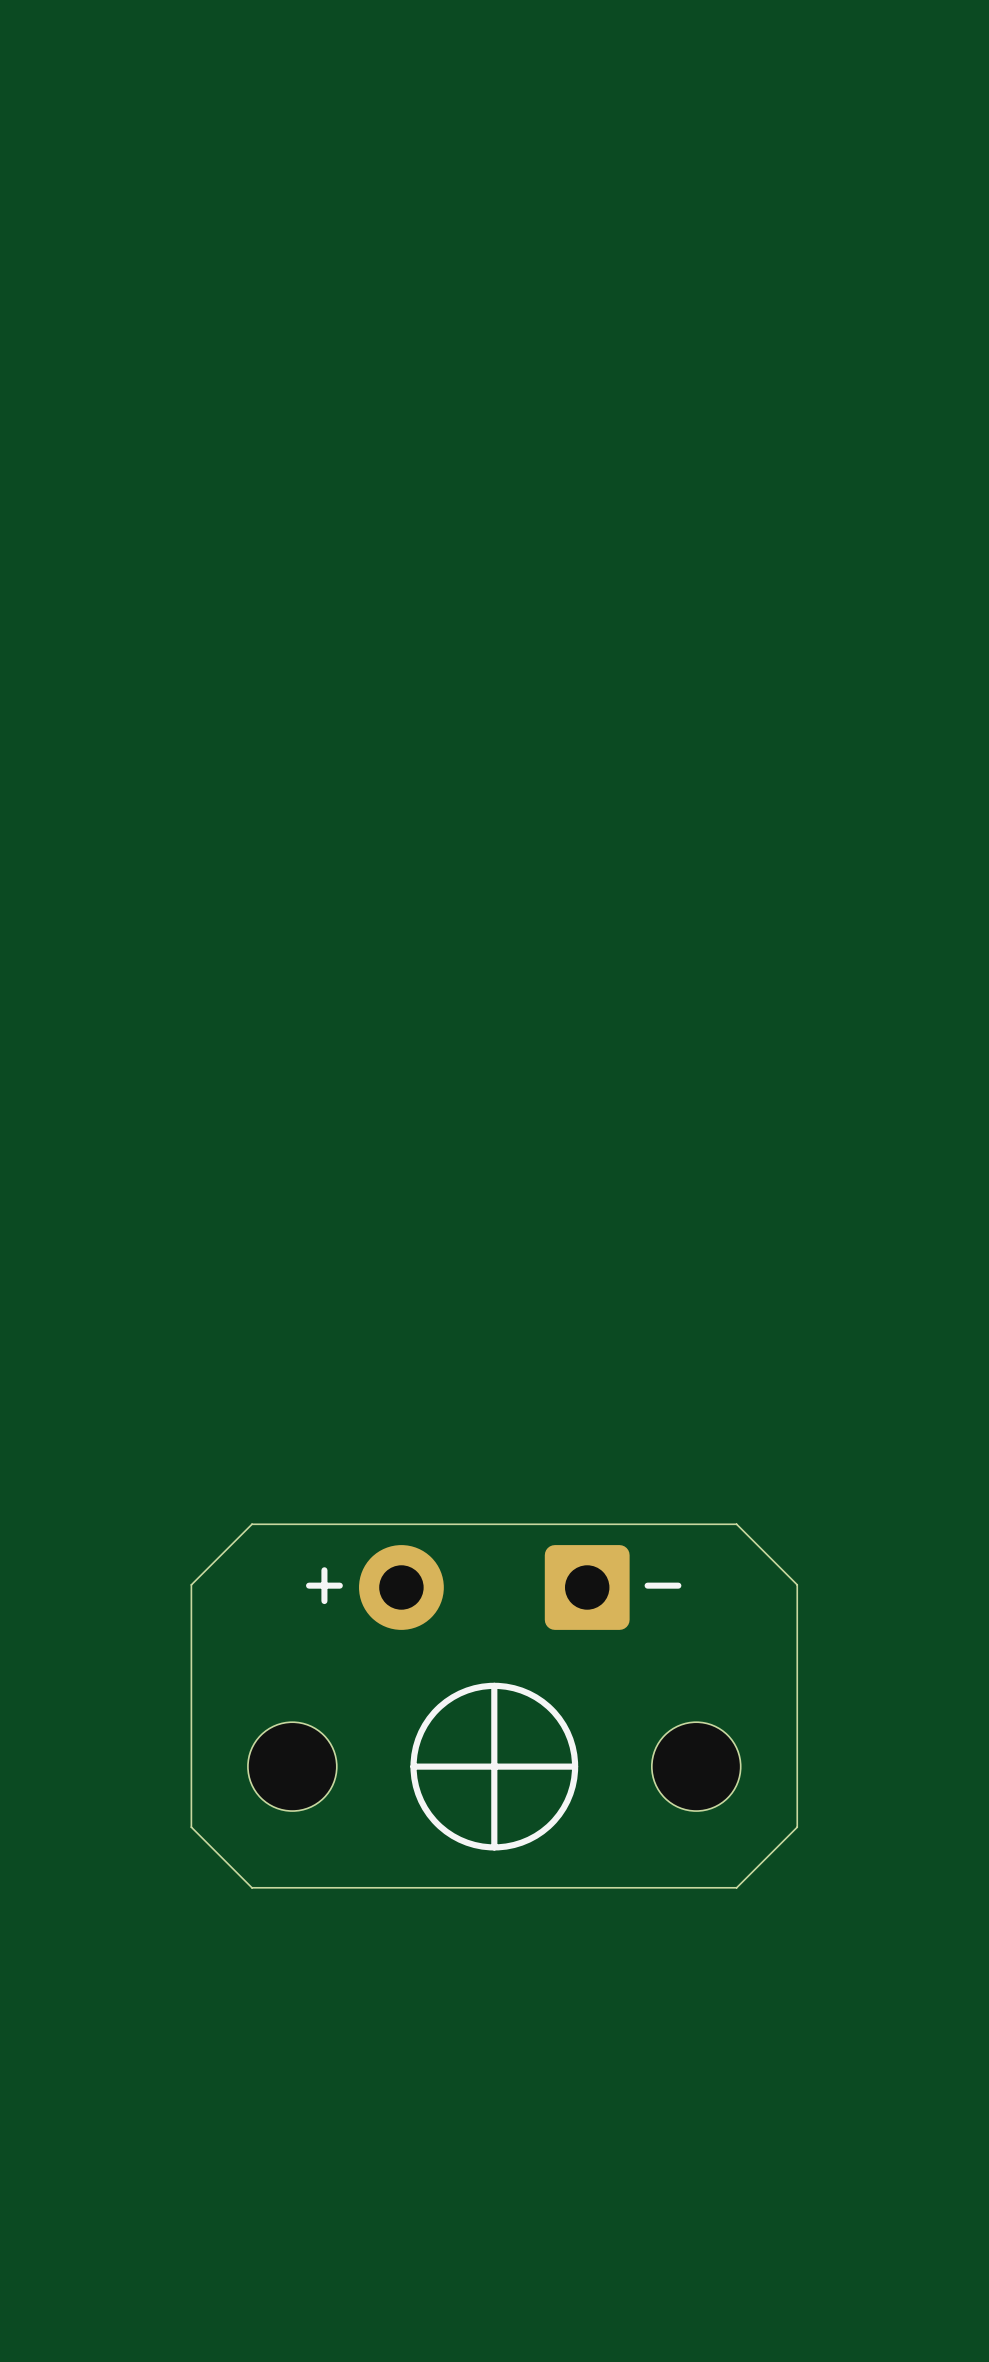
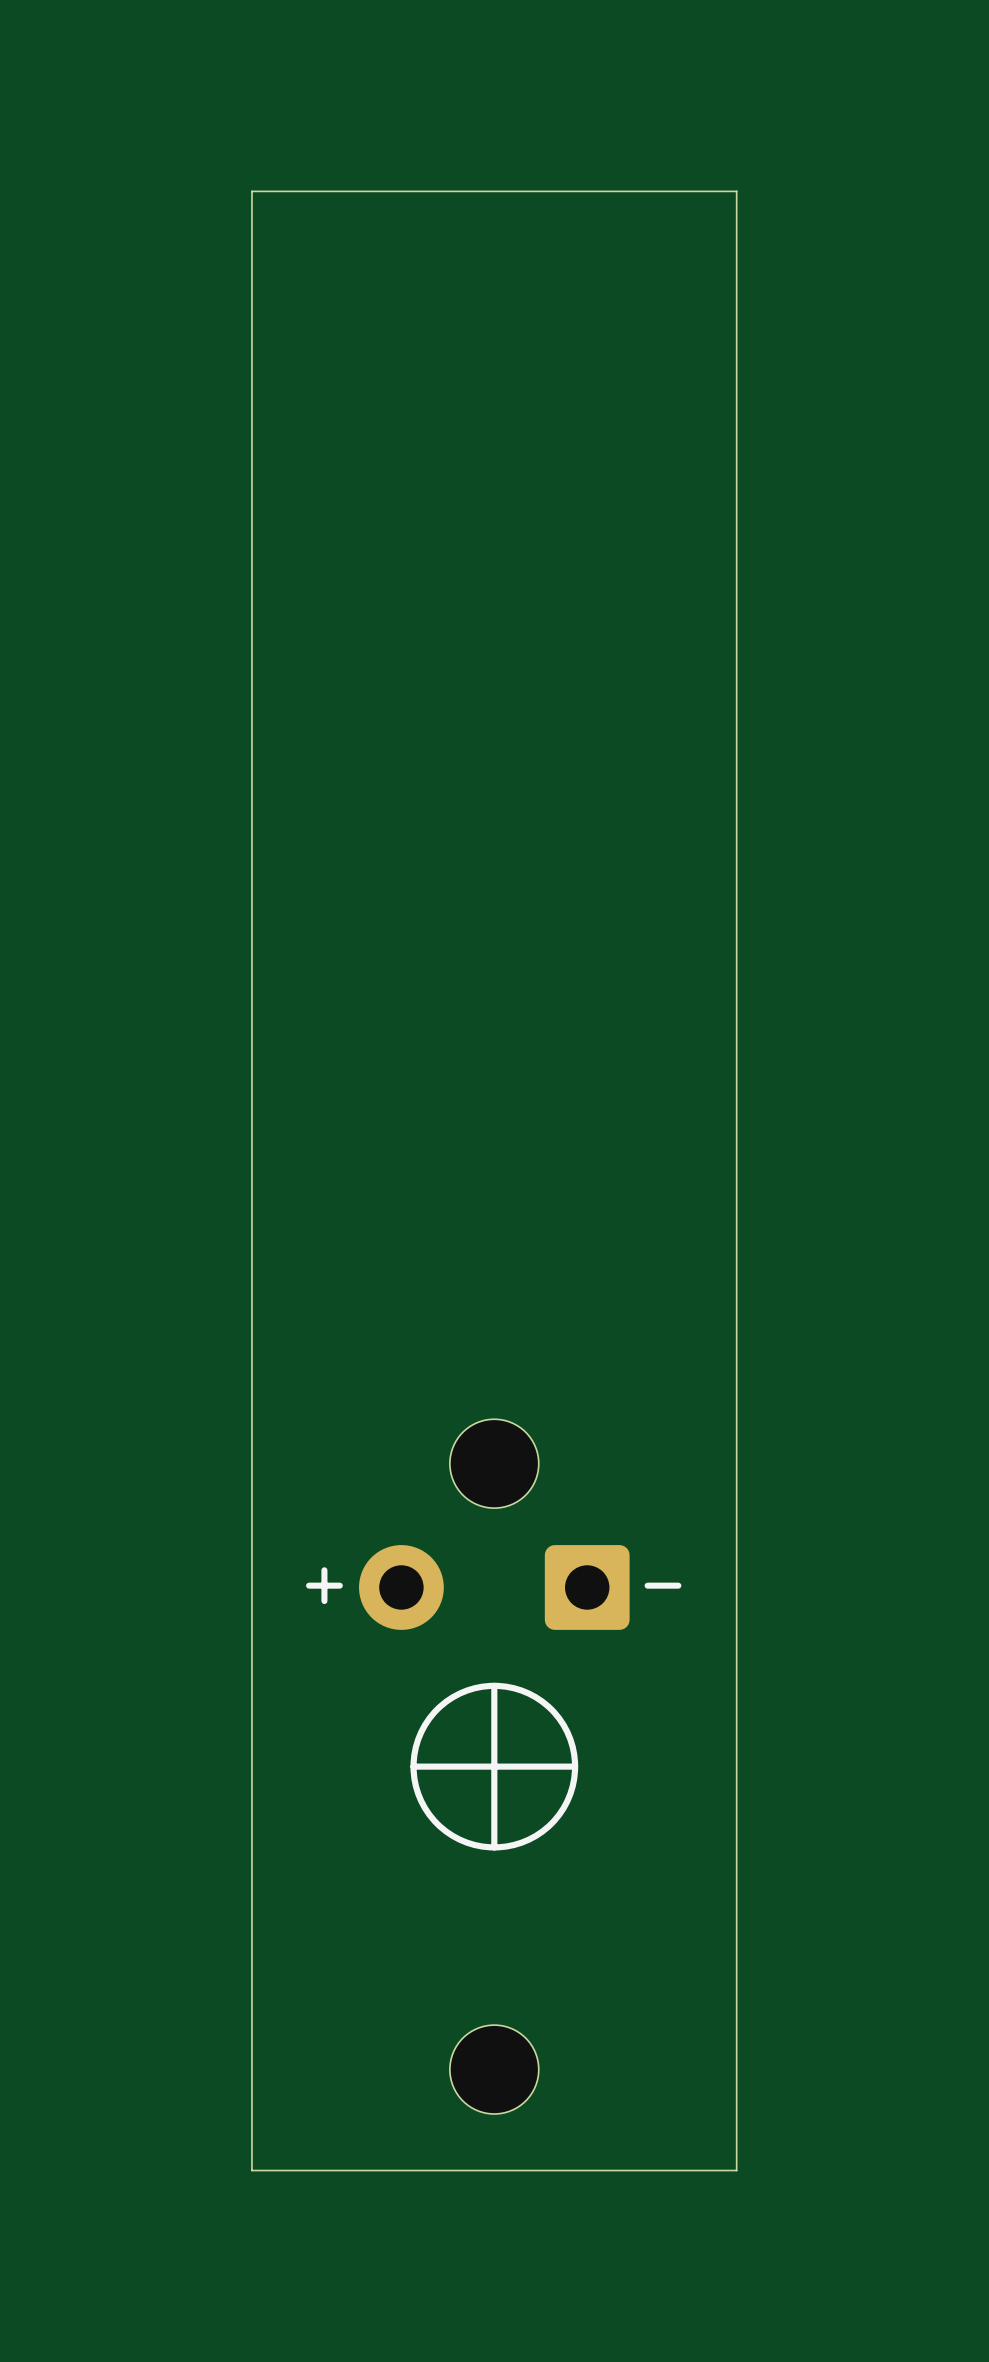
board edge: none -> (736, 191) (736, 2170) (251, 2170) (251, 191) (736, 191)
part: none -> (494, 1463)
board edge: (736, 1524) (797, 1584) (797, 1827) (736, 1887) (251, 1887) (191, 1827) (191, 1584) (251, 1524) (736, 1524) -> none
part: (292, 1766) -> none
part: (696, 1766) -> none
part: none -> (494, 2069)

